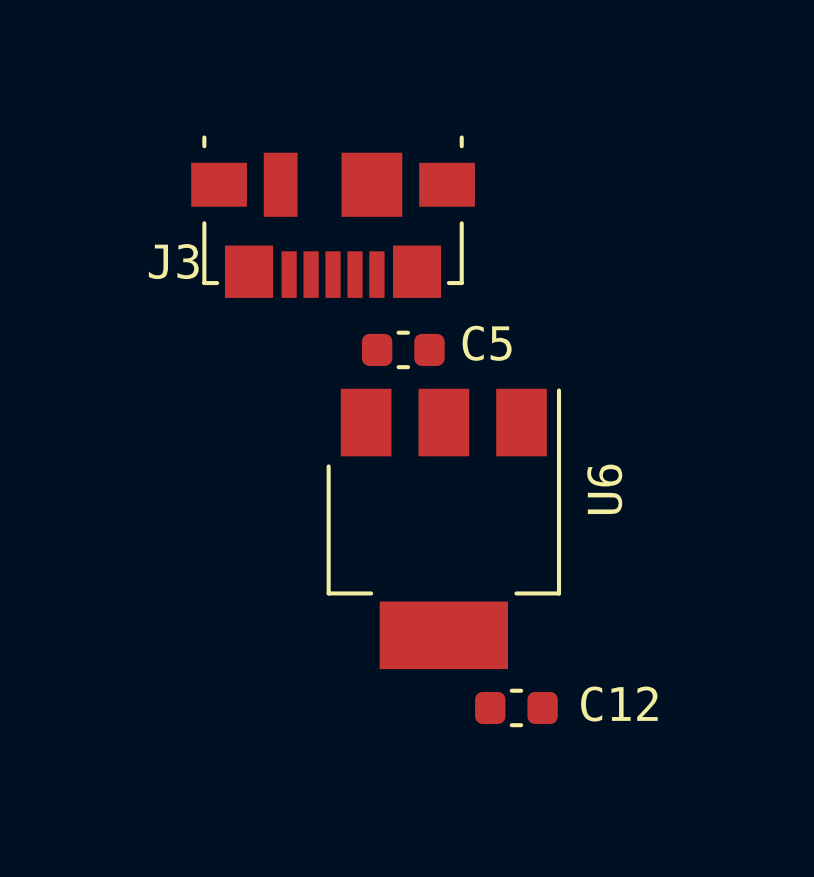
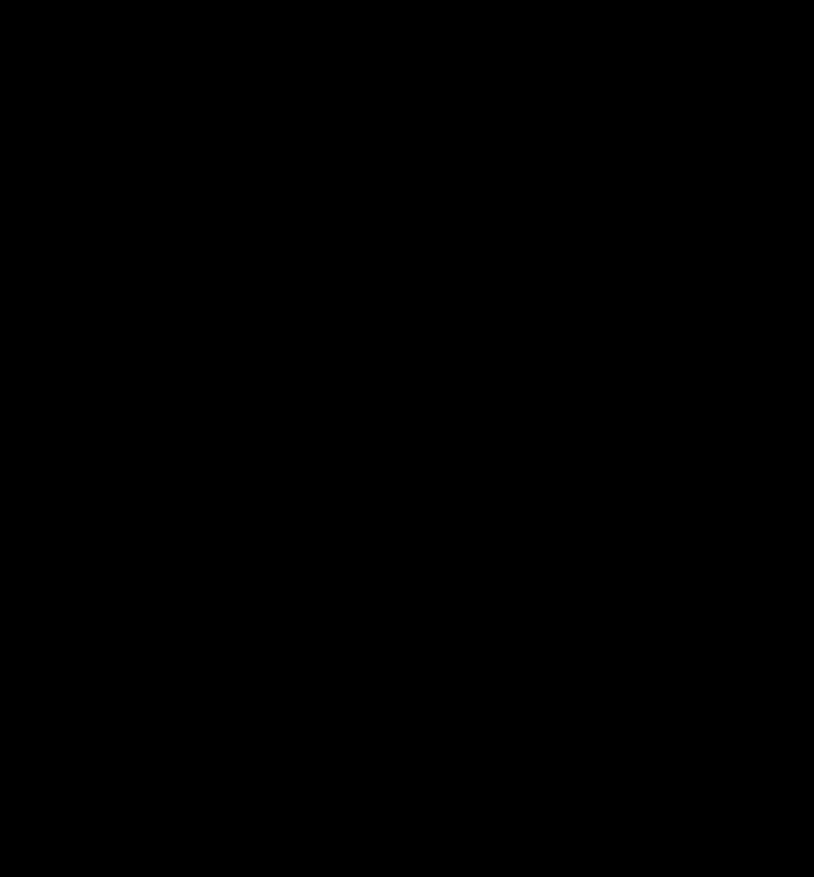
J3: (333, 216) -> none
C5: (403, 349) -> none
U6: (443, 528) -> none
C12: (516, 707) -> none

